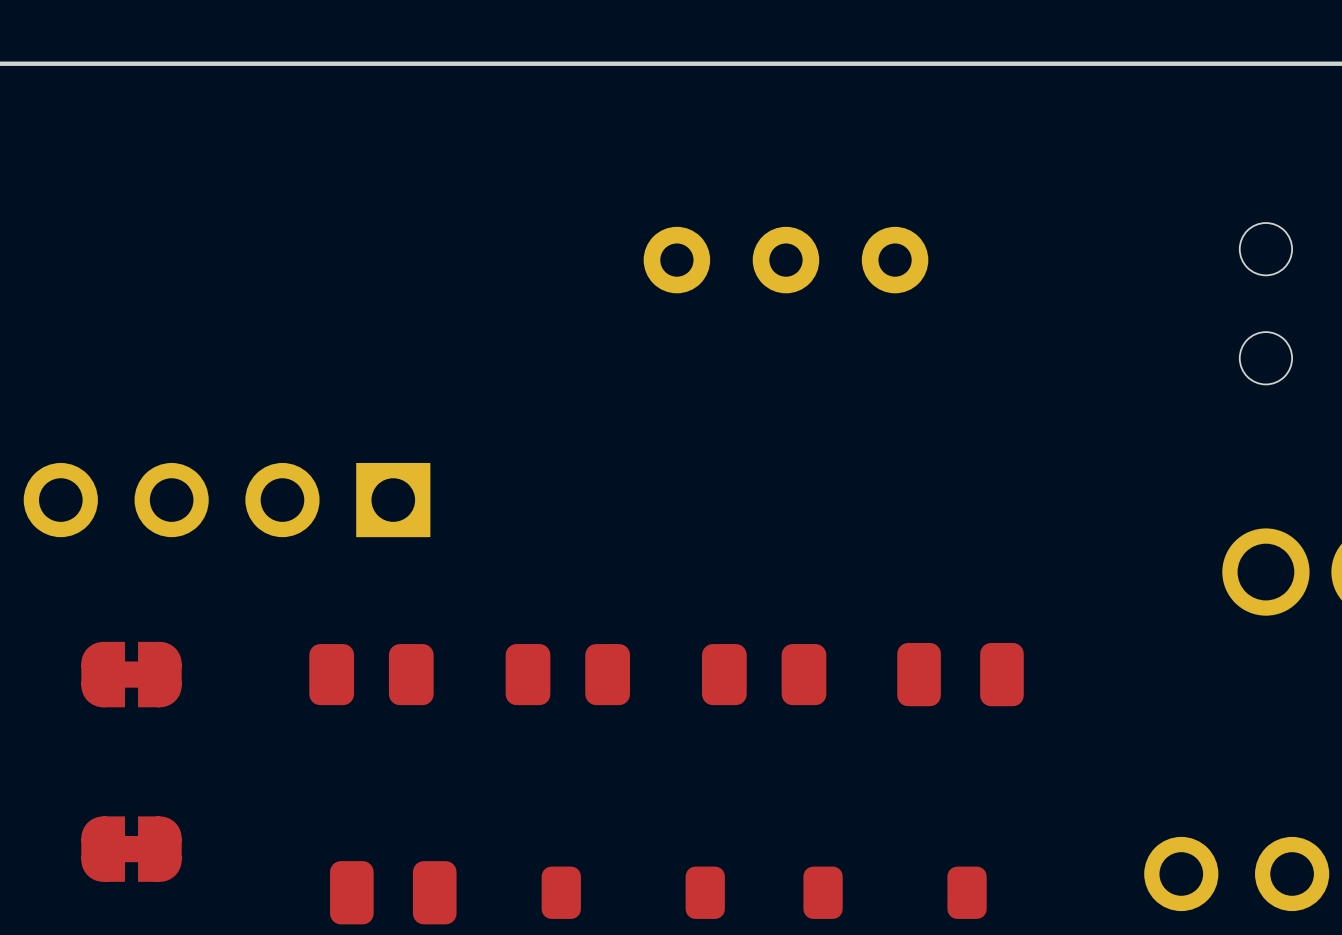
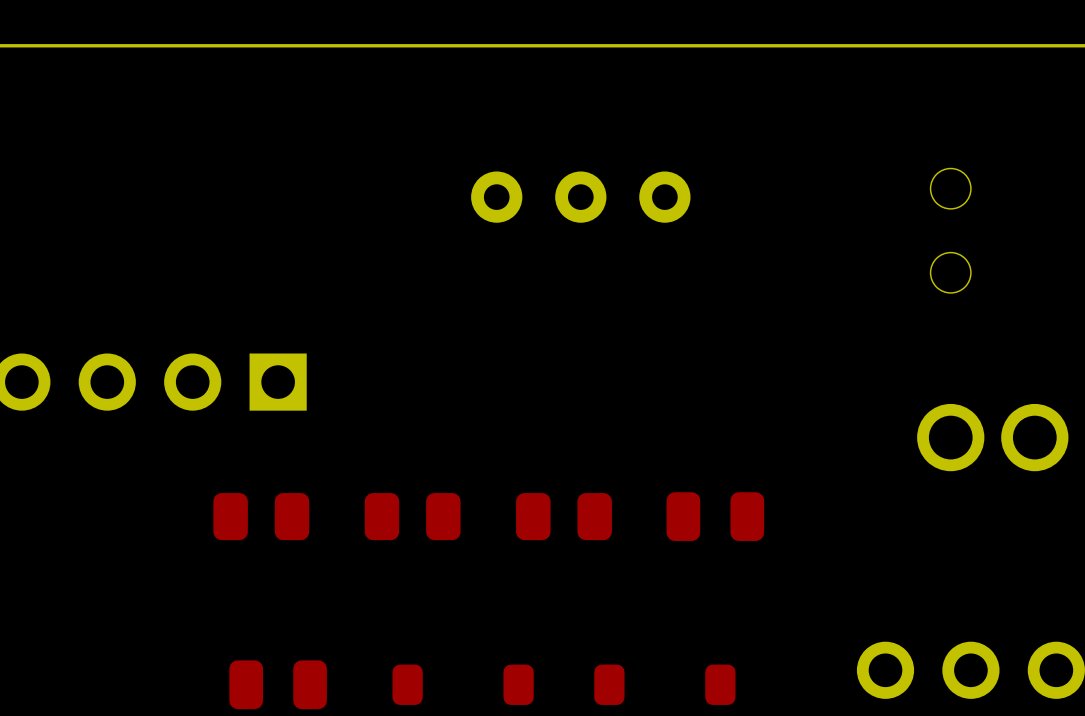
part: (131, 674) -> none
part: (131, 849) -> none

